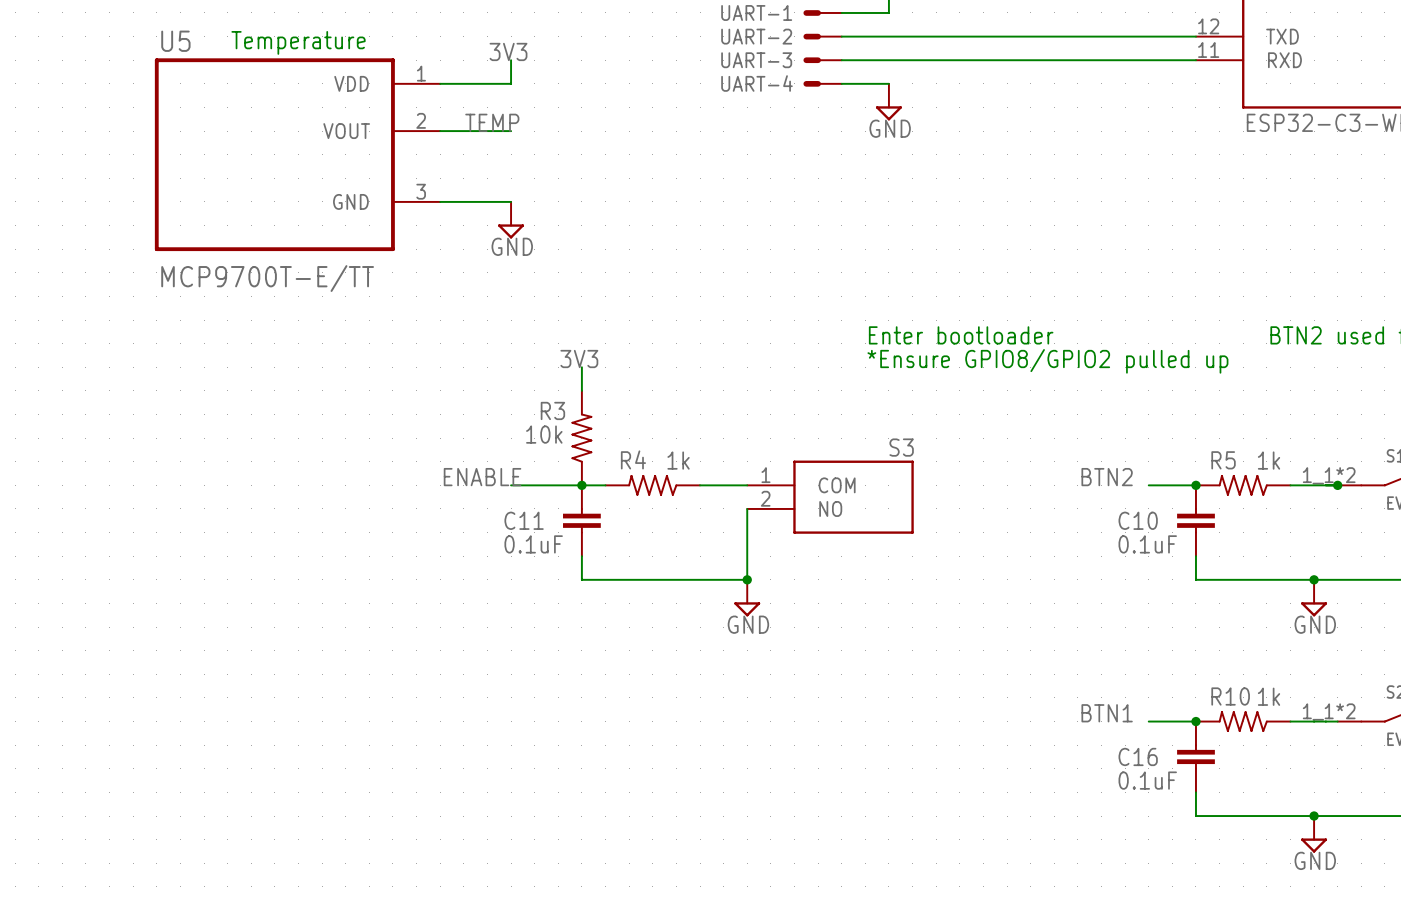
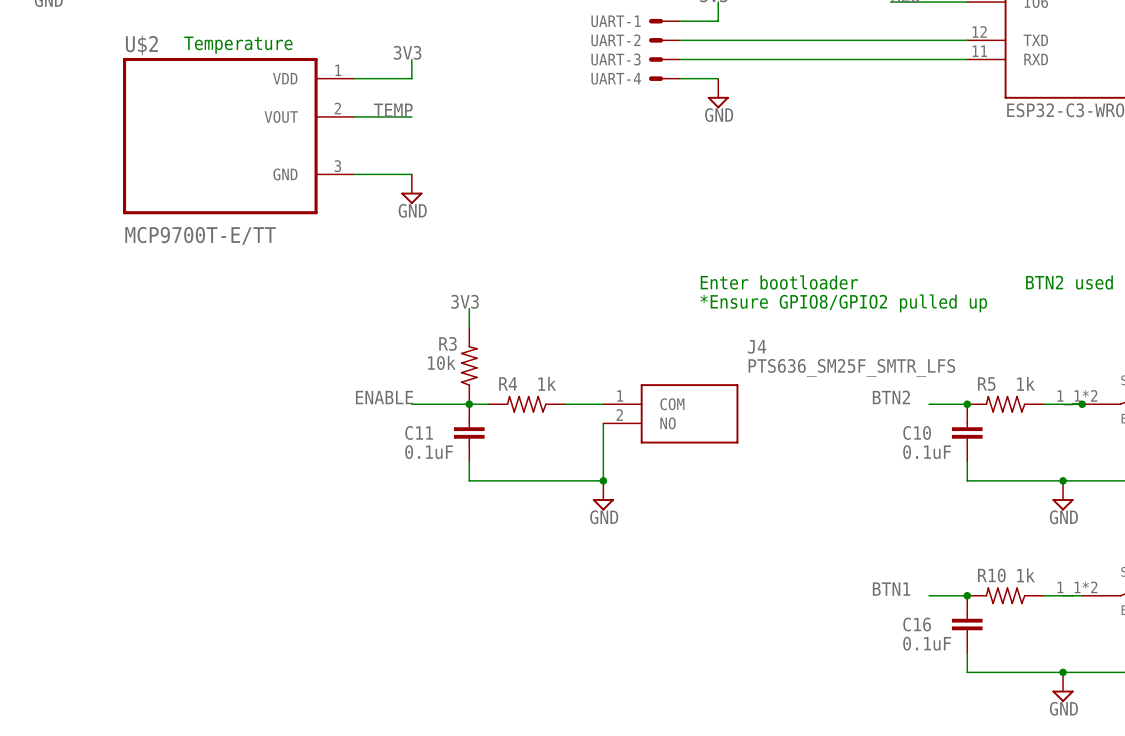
U5 name: U5 (175, 41) -> U$2 (141, 45)
S3 value: none -> PTS636_SM25F_SMTR_LFS (851, 367)
S3 name: S3 (901, 447) -> J4 (757, 346)

